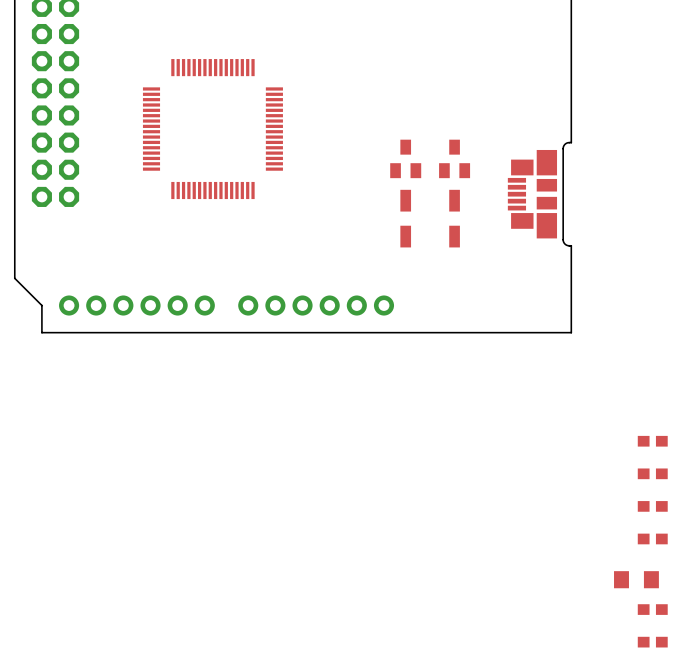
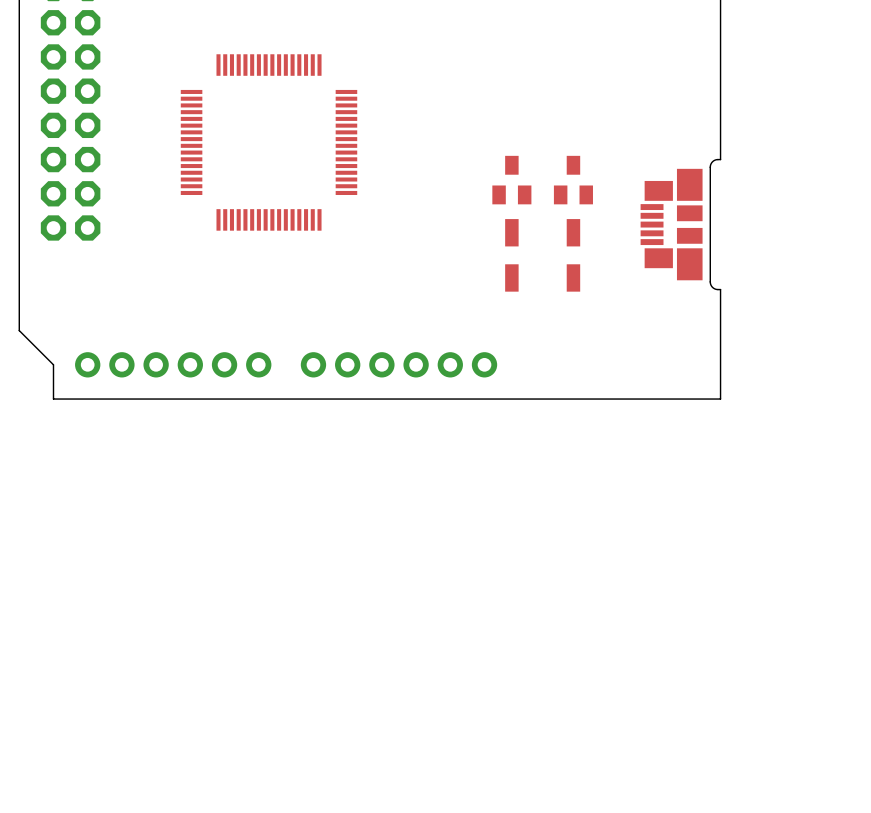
part: (652, 441) -> none
part: (652, 473) -> none
part: (652, 506) -> none
part: (652, 538) -> none
part: (636, 579) -> none
part: (652, 609) -> none
part: (652, 642) -> none

